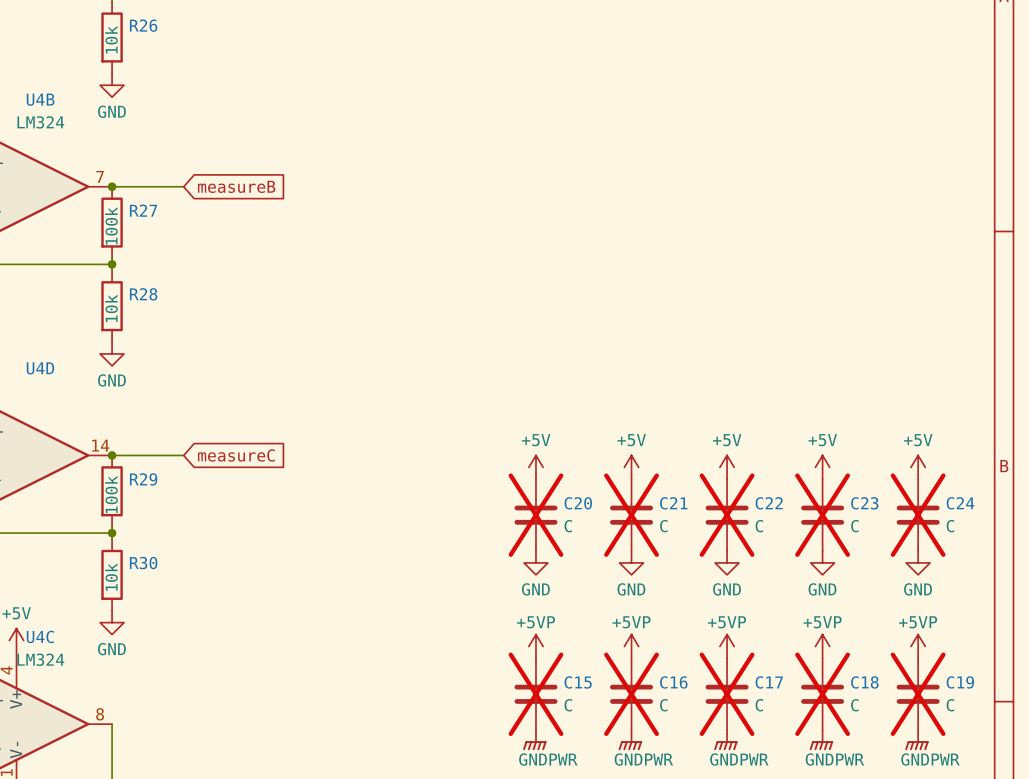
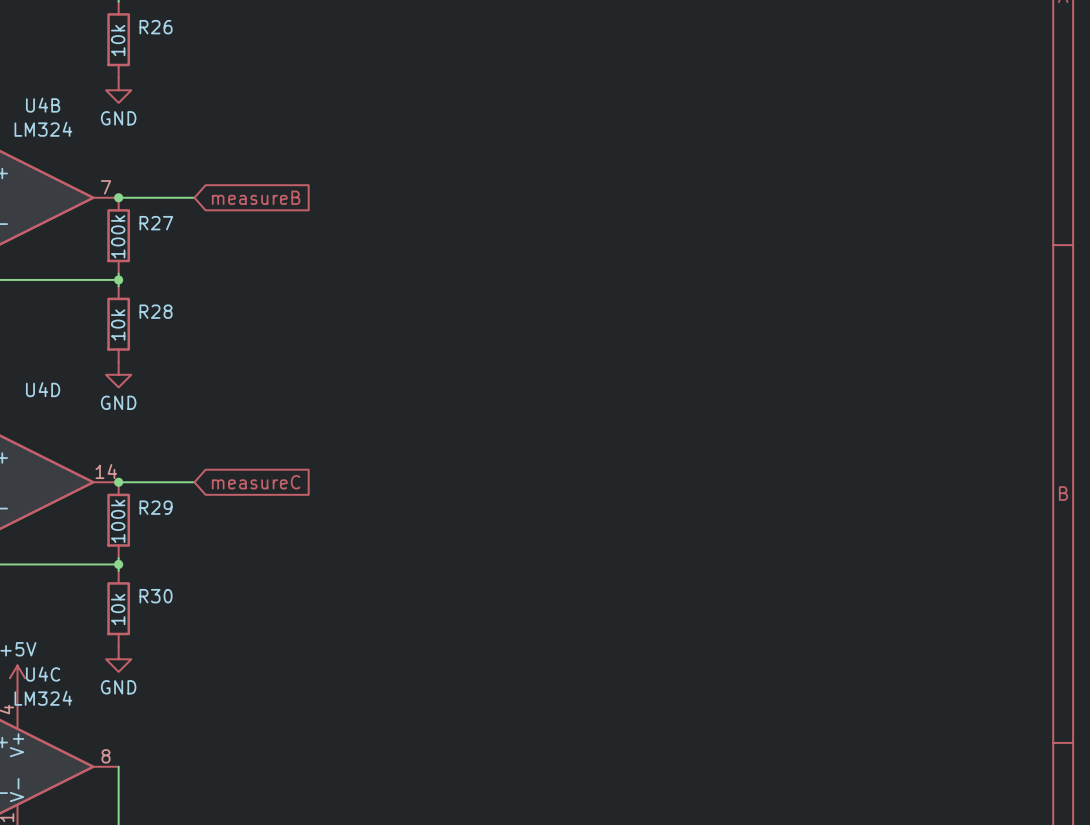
power symbol: +5V (535, 467) -> none
power symbol: +5V (631, 467) -> none
power symbol: +5V (727, 467) -> none
power symbol: +5V (822, 467) -> none
power symbol: +5V (918, 467) -> none
C20: C (535, 515) -> none
C21: C (631, 515) -> none
C22: C (727, 515) -> none
C23: C (822, 515) -> none
C24: C (918, 515) -> none
power symbol: GND (535, 562) -> none
power symbol: GND (631, 562) -> none
power symbol: GND (727, 562) -> none
power symbol: GND (822, 562) -> none
power symbol: GND (918, 562) -> none
power symbol: +5VP (535, 646) -> none
power symbol: +5VP (631, 646) -> none
power symbol: +5VP (727, 646) -> none
power symbol: +5VP (822, 646) -> none
power symbol: +5VP (918, 646) -> none
C15: C (535, 694) -> none
C16: C (631, 694) -> none
C17: C (727, 694) -> none
C18: C (822, 694) -> none
C19: C (918, 694) -> none
power symbol: GNDPWR (534, 740) -> none
power symbol: GNDPWR (630, 740) -> none
power symbol: GNDPWR (725, 740) -> none
power symbol: GNDPWR (821, 740) -> none
power symbol: GNDPWR (916, 740) -> none

